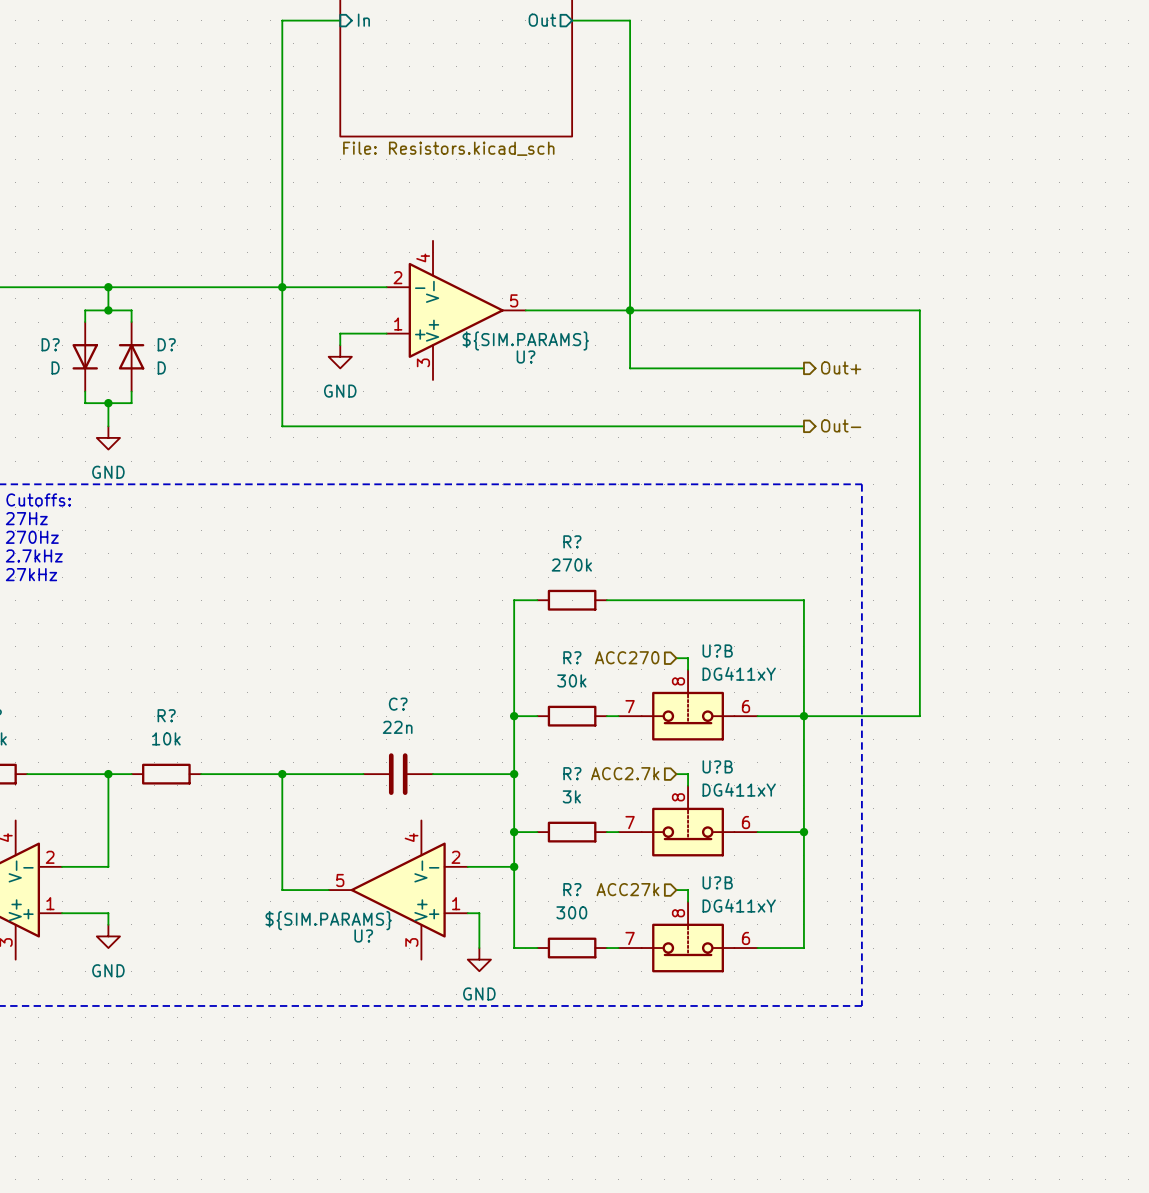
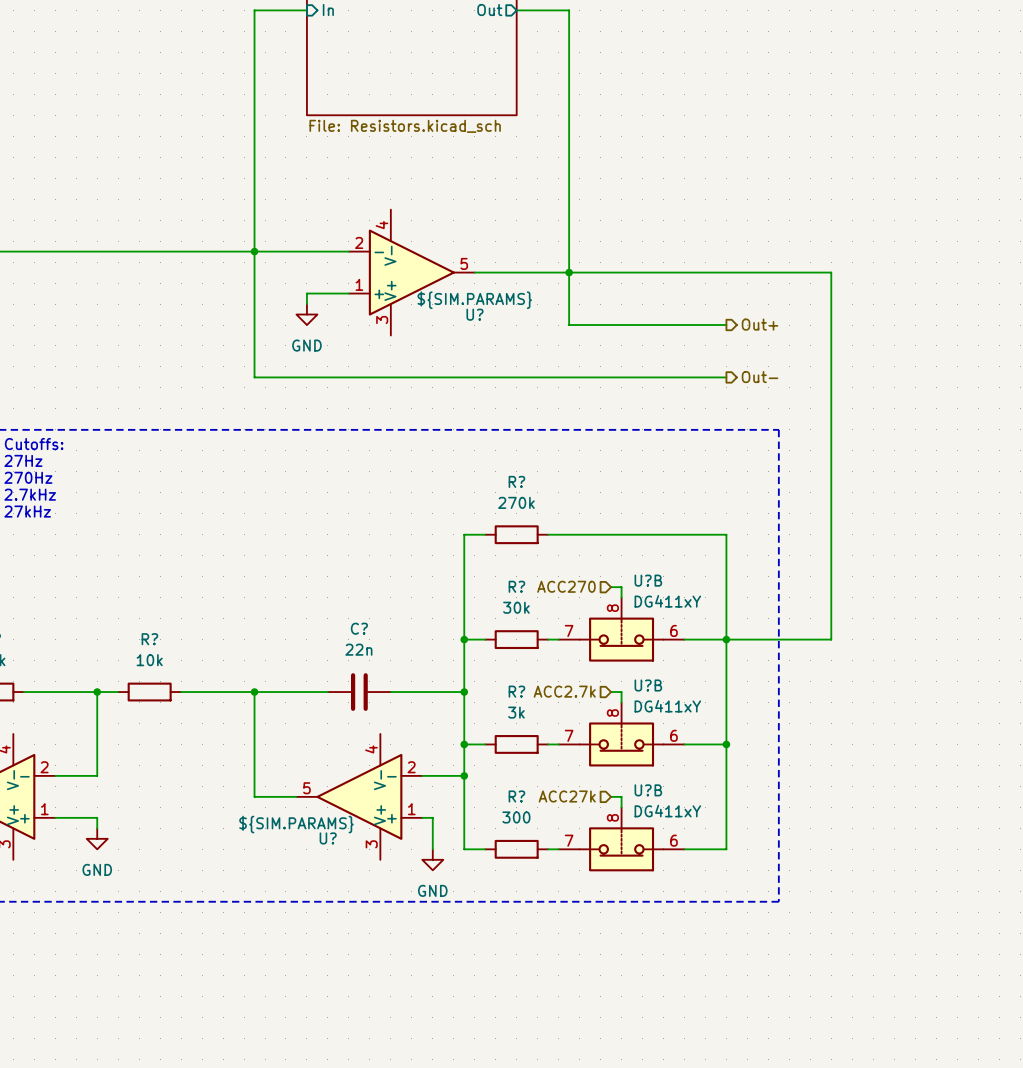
wire: (108, 287) (108, 310) -> none
junction: (108, 287) -> none
junction: (108, 310) -> none
wire: (85, 322) (85, 310) (131, 310) (131, 322) -> none
D?: D (85, 356) -> none
D?: D (131, 356) -> none
wire: (85, 391) (85, 403) (131, 403) (131, 391) -> none
wire: (108, 403) (108, 426) -> none
junction: (108, 403) -> none
power symbol: GND (108, 437) -> none

